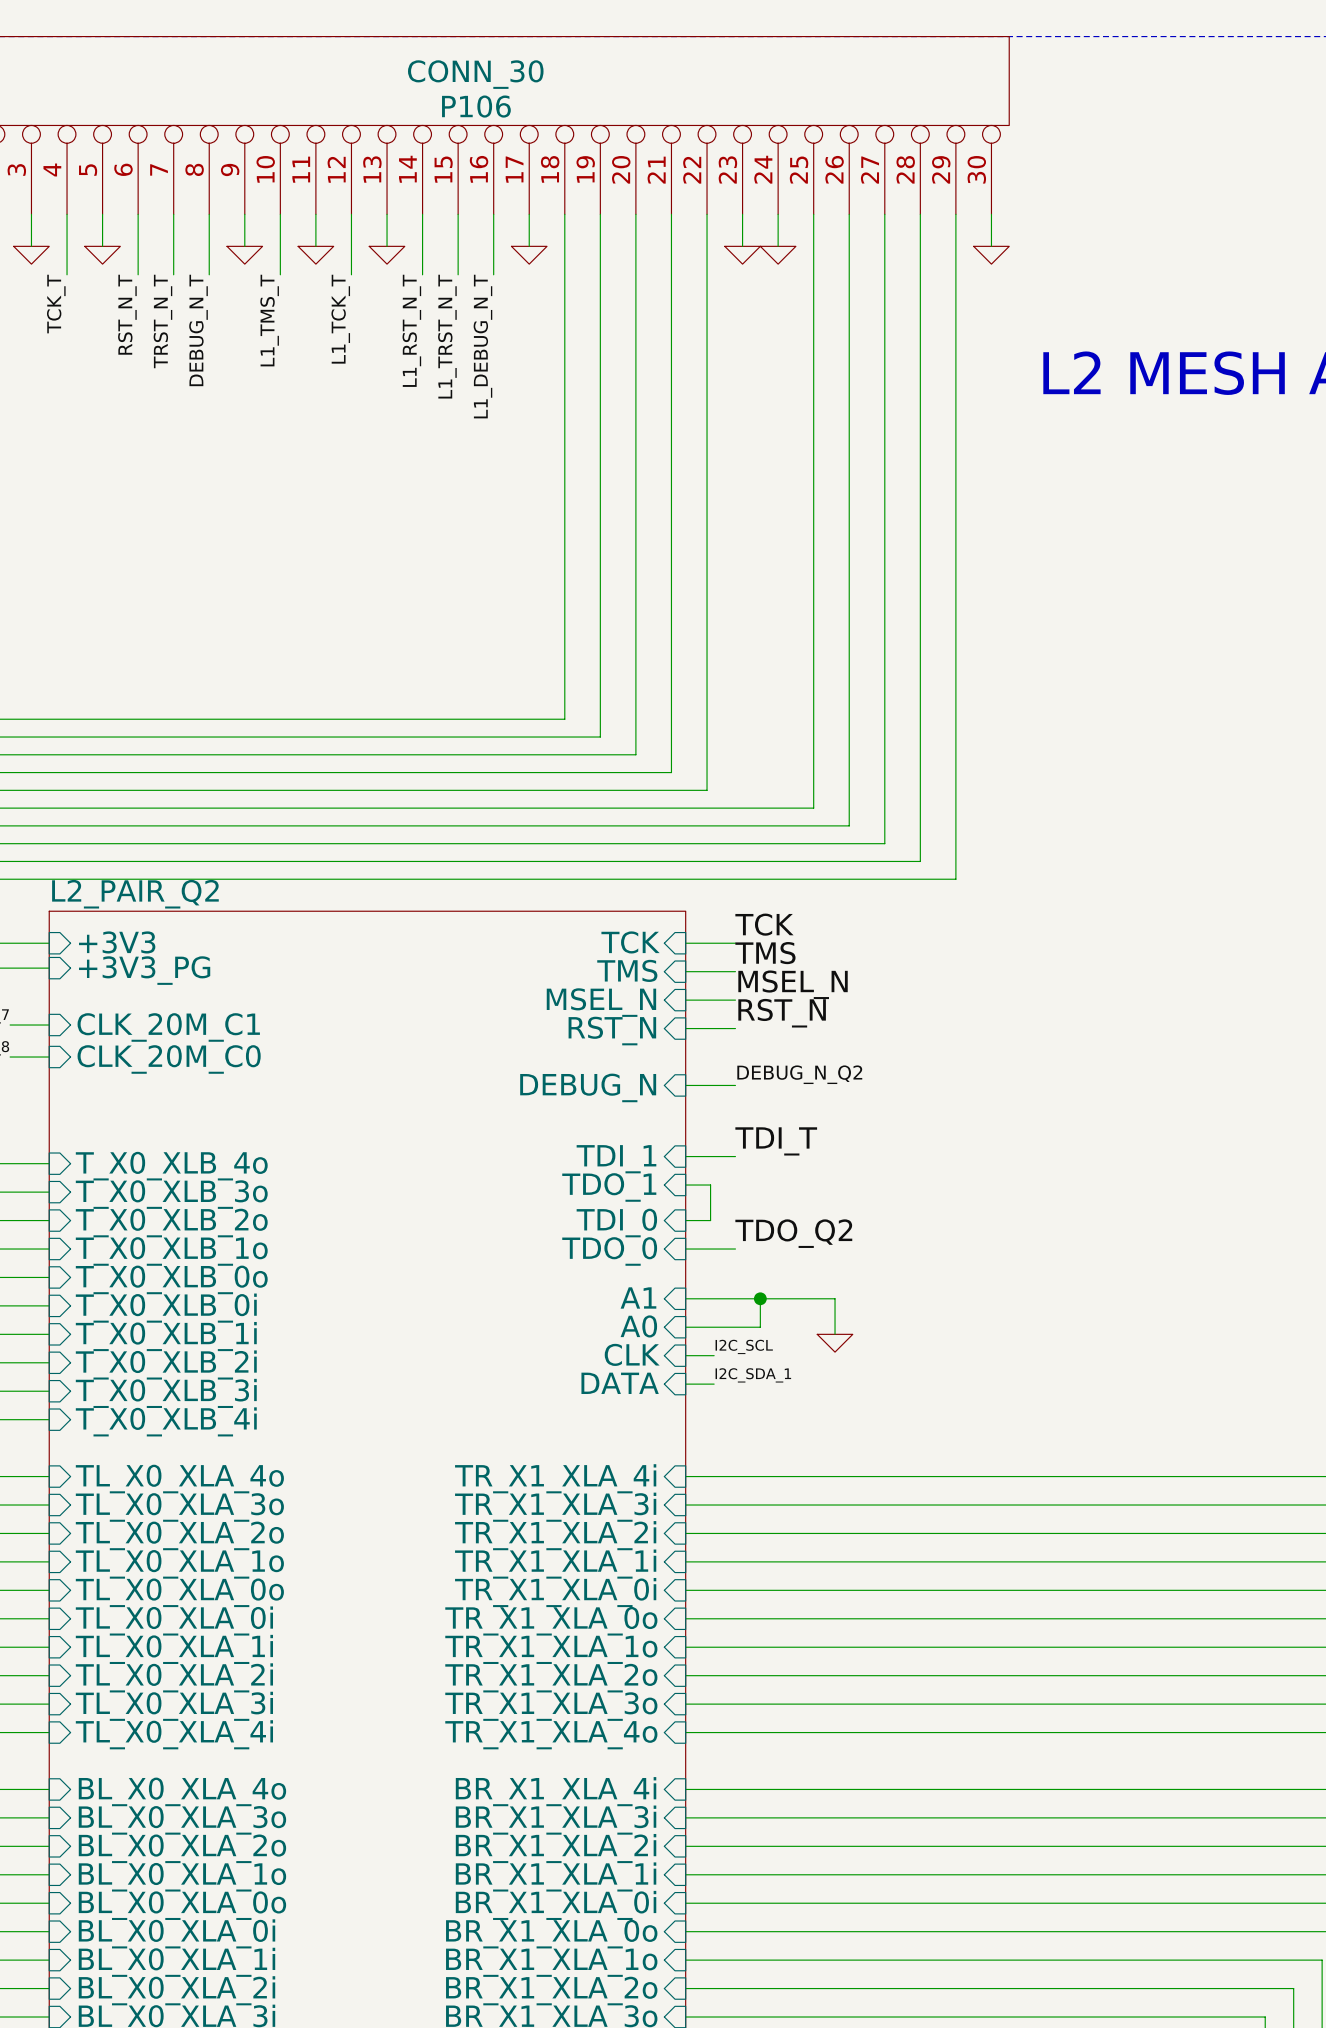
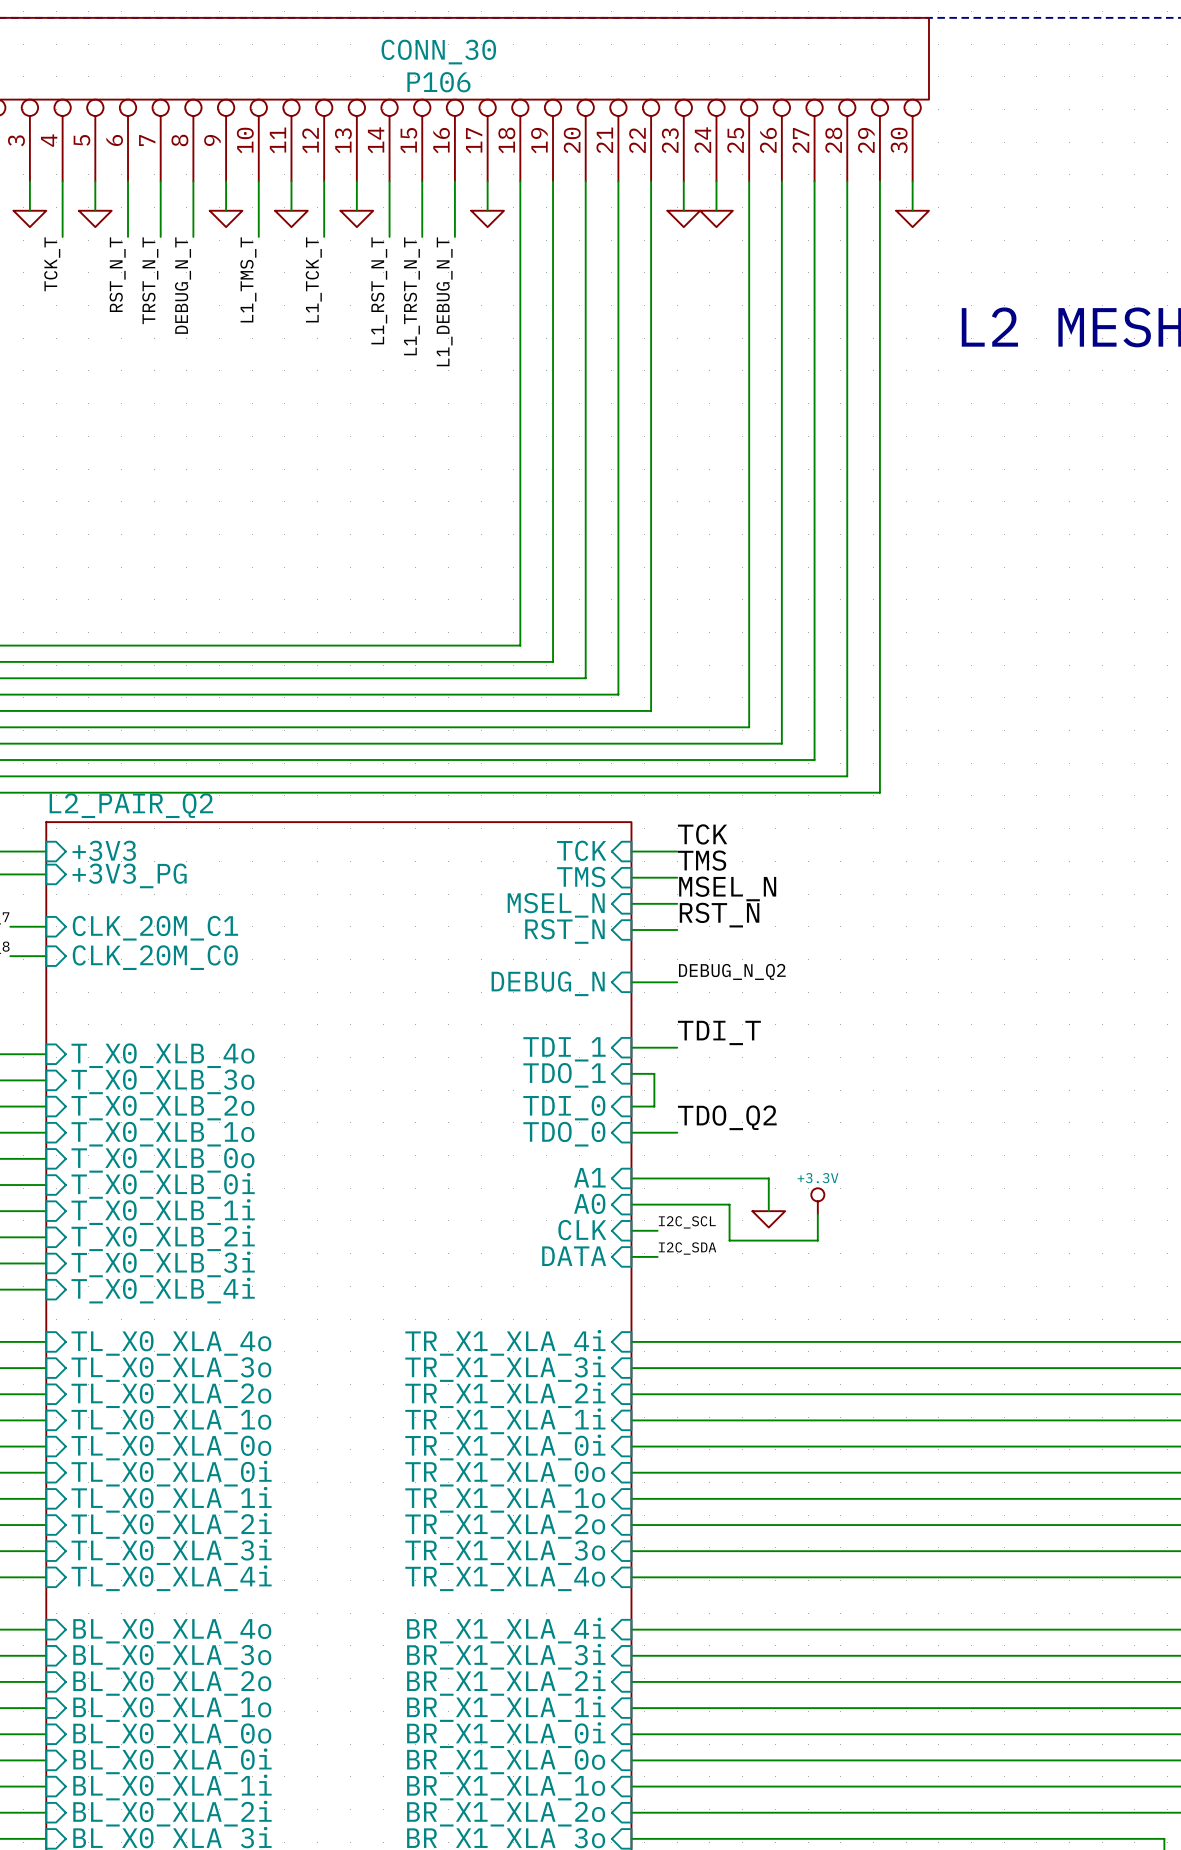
wire: (760, 1298) (760, 1327) -> (817, 1214) (817, 1240) (729, 1240) (729, 1204) (700, 1204)
junction: (760, 1298) -> none
power symbol: none -> +3.3V (817, 1201)
label: I2C_SDA_1 (753, 1375) -> I2C_SDA (687, 1248)

